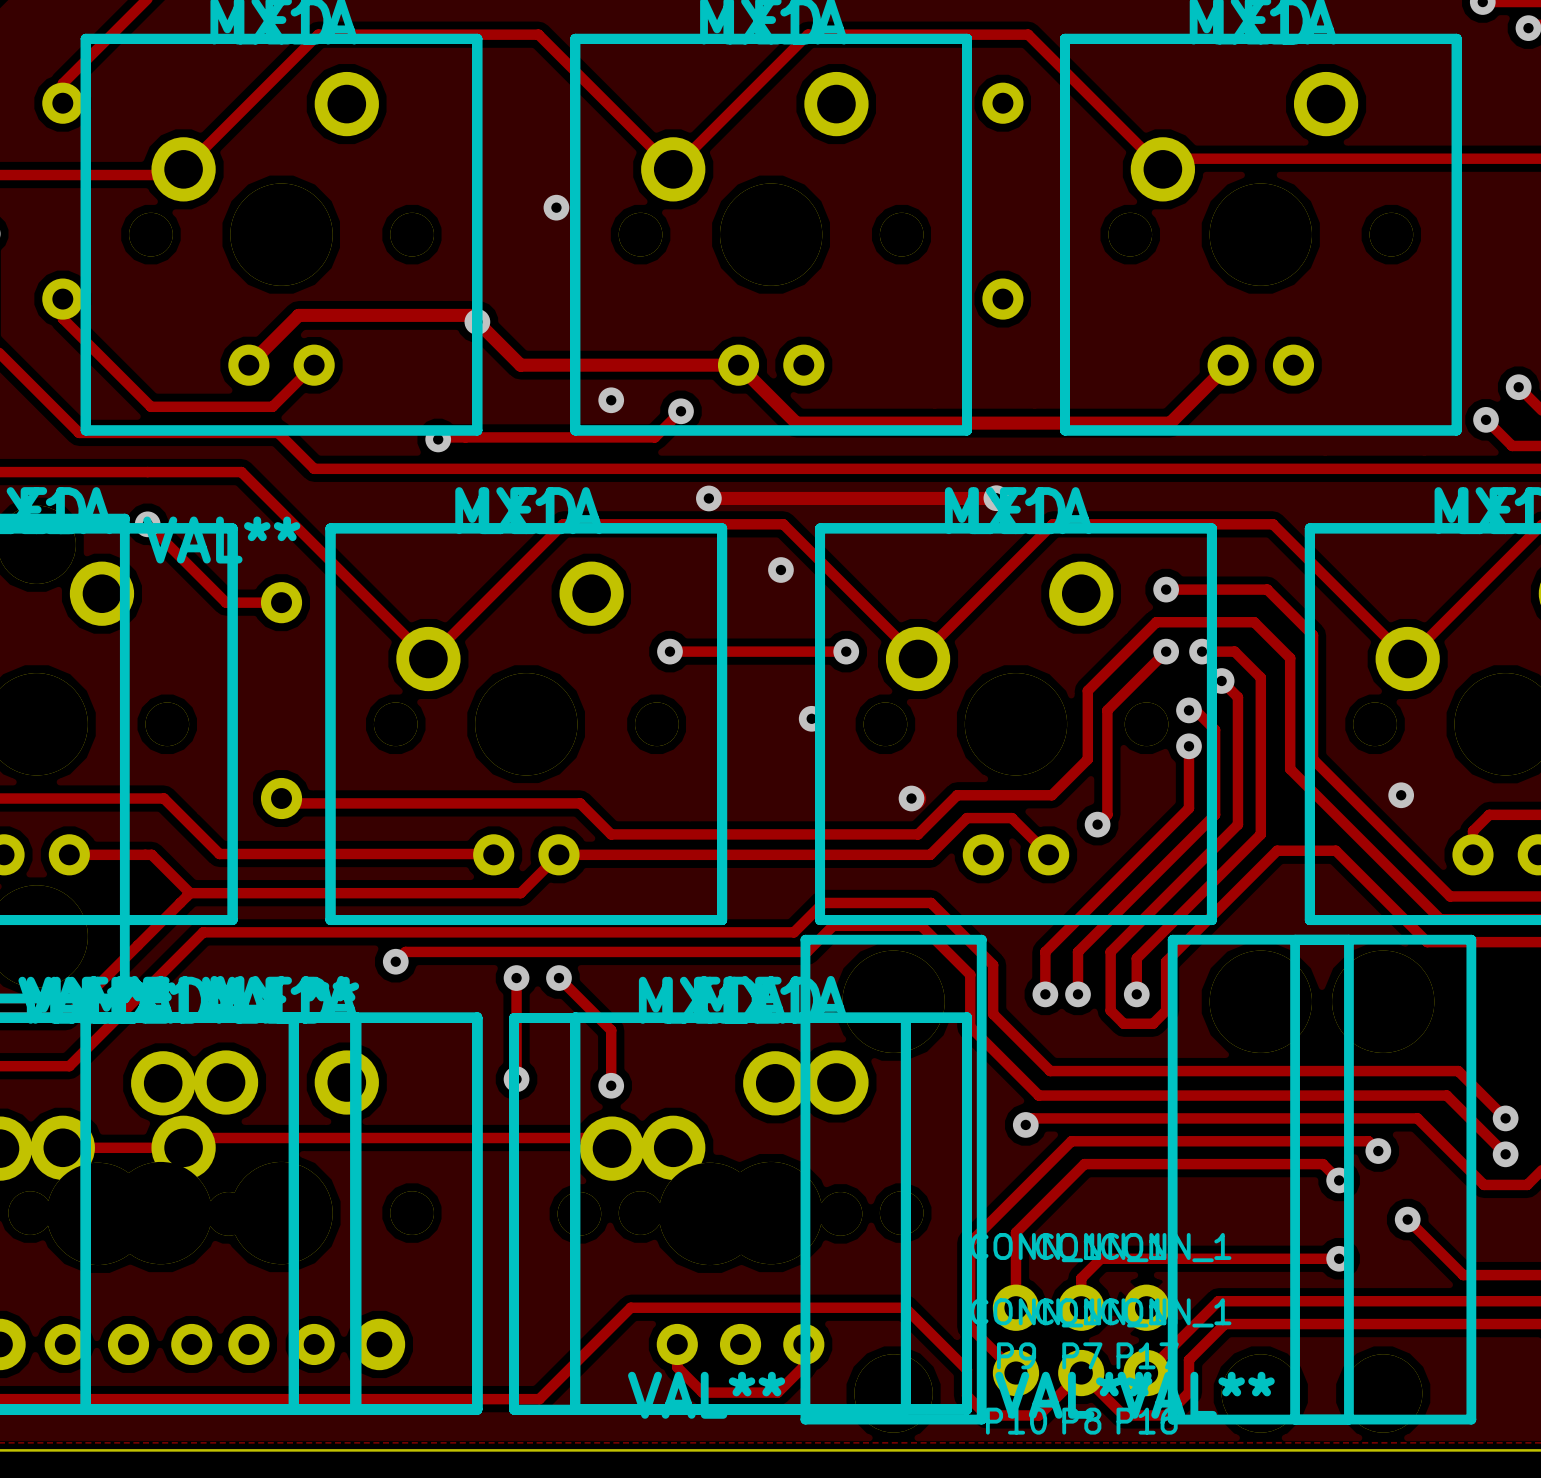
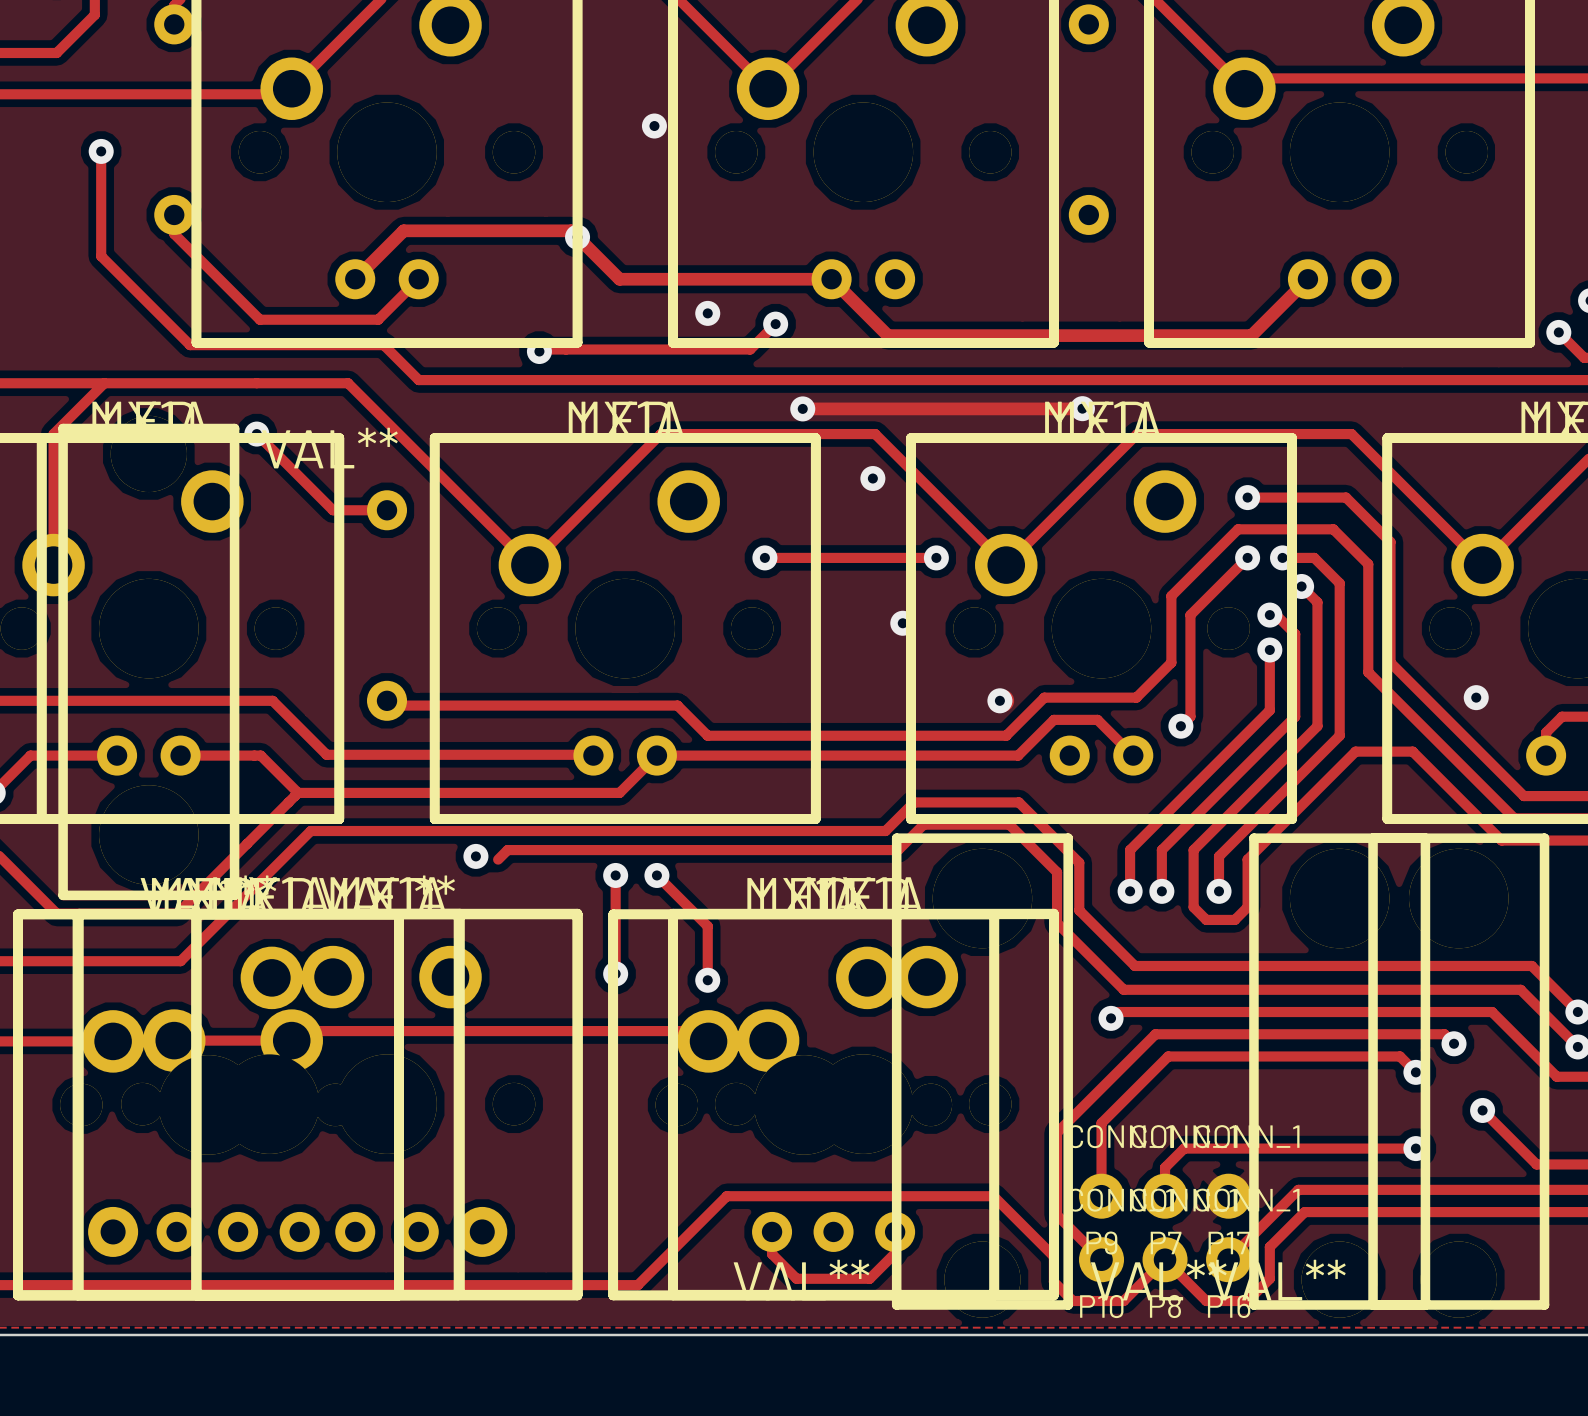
via position: (395, 961) -> (475, 856)

